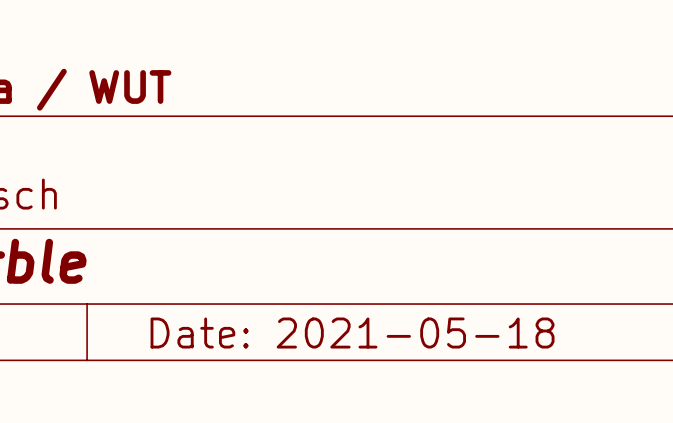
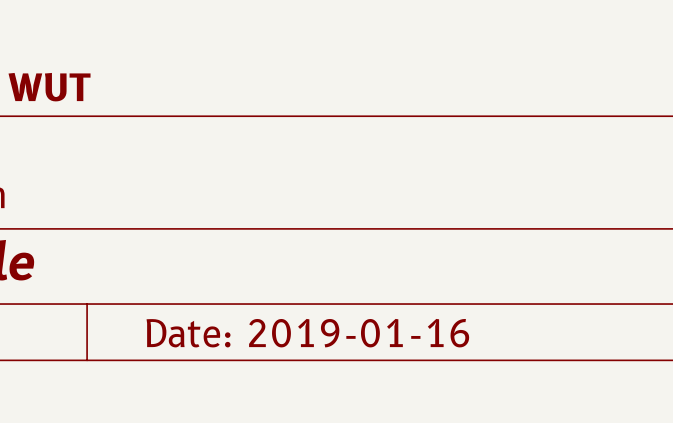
title block: Date: 2021-05-18 (352, 333) -> Date: 2019-01-16 (307, 333)

